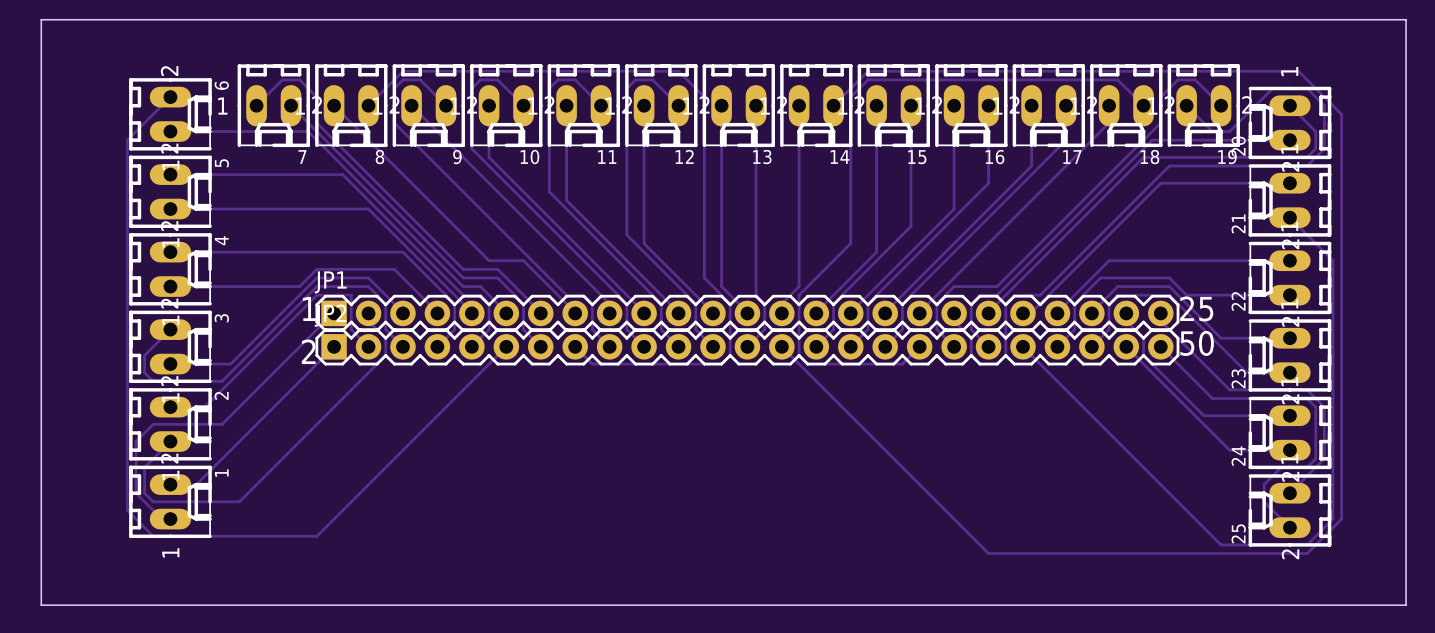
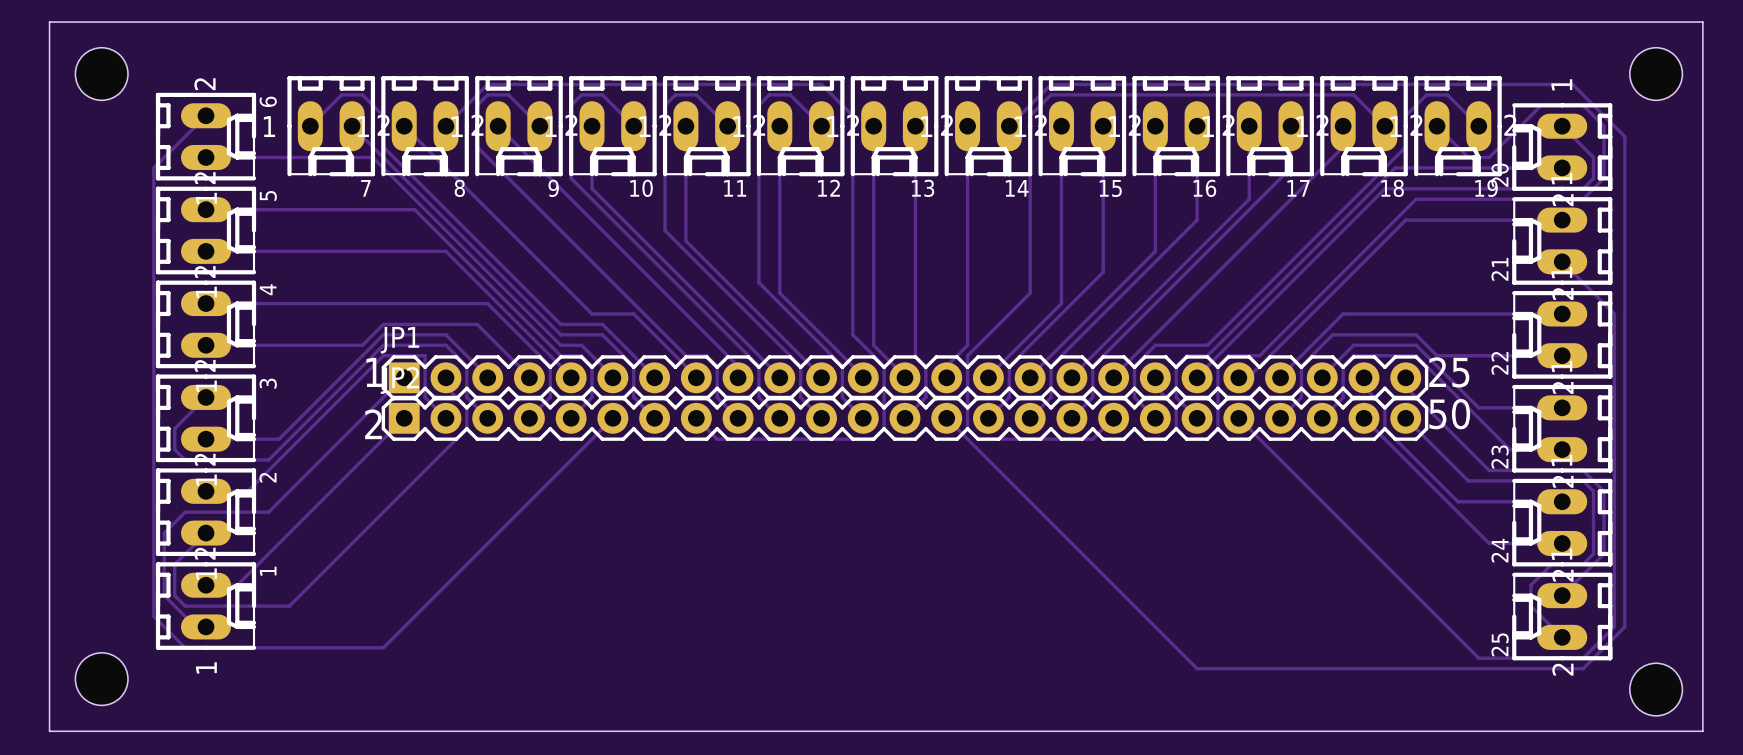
hole: none -> (101, 74)
hole: none -> (1656, 74)
hole: none -> (101, 679)
hole: none -> (1656, 689)

